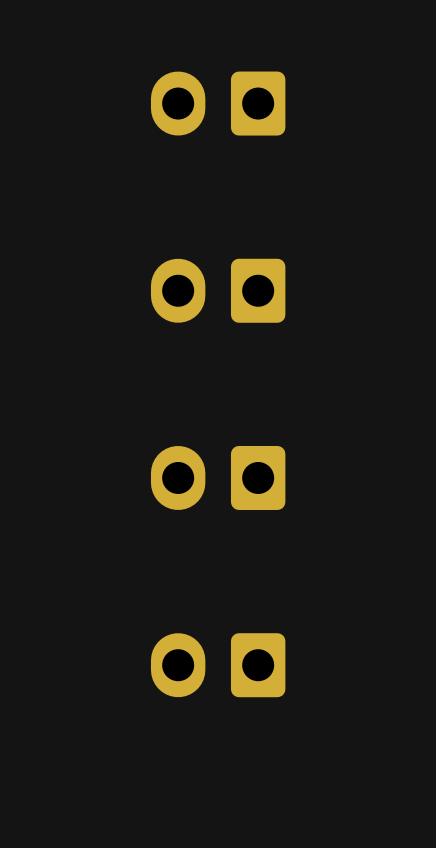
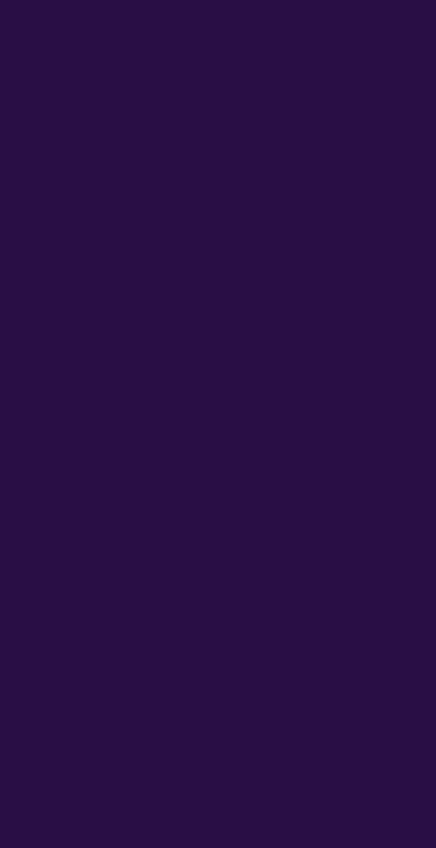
part: (218, 103) -> none
part: (218, 290) -> none
part: (218, 477) -> none
part: (218, 665) -> none

